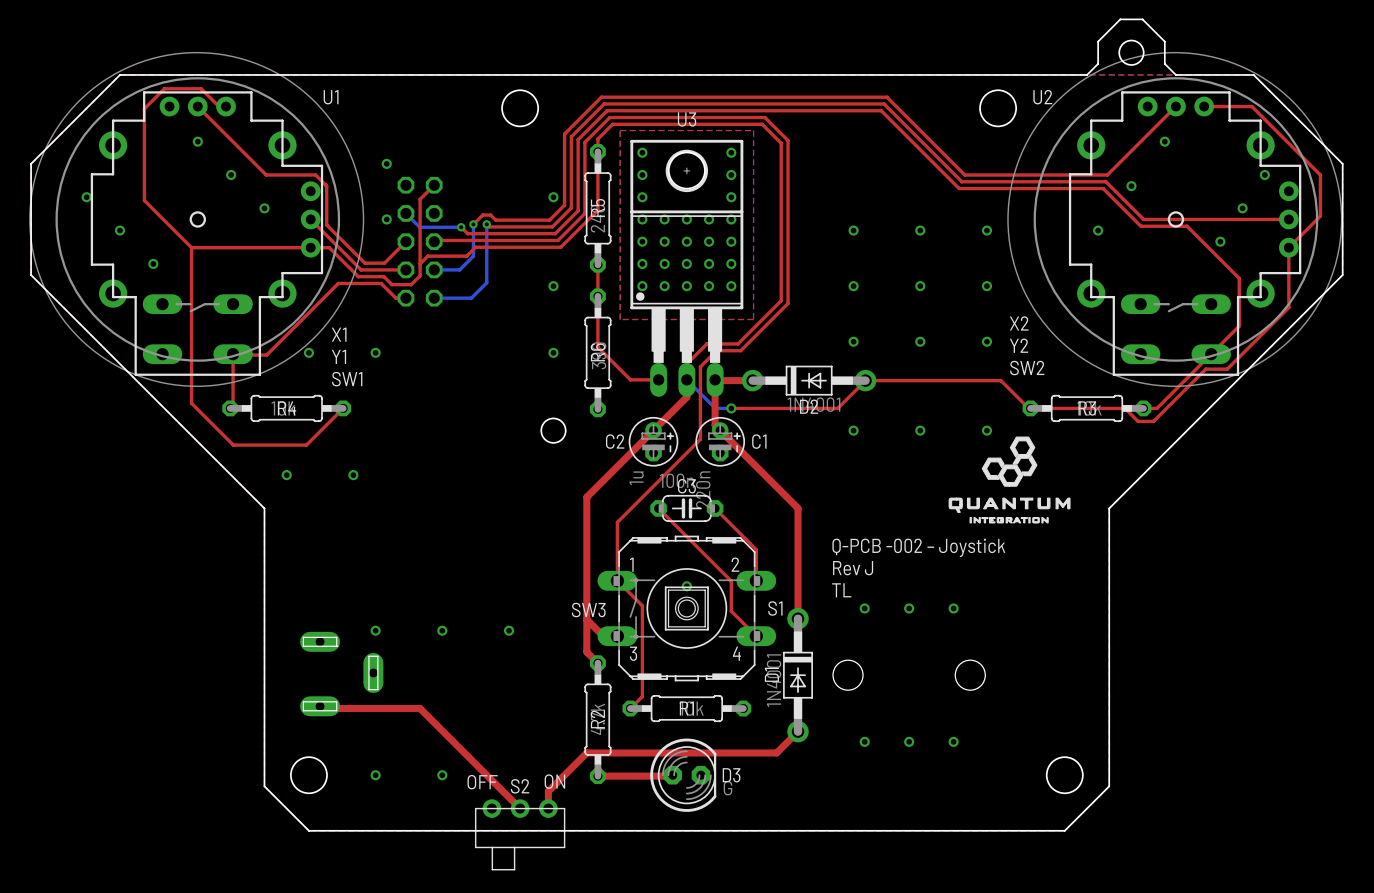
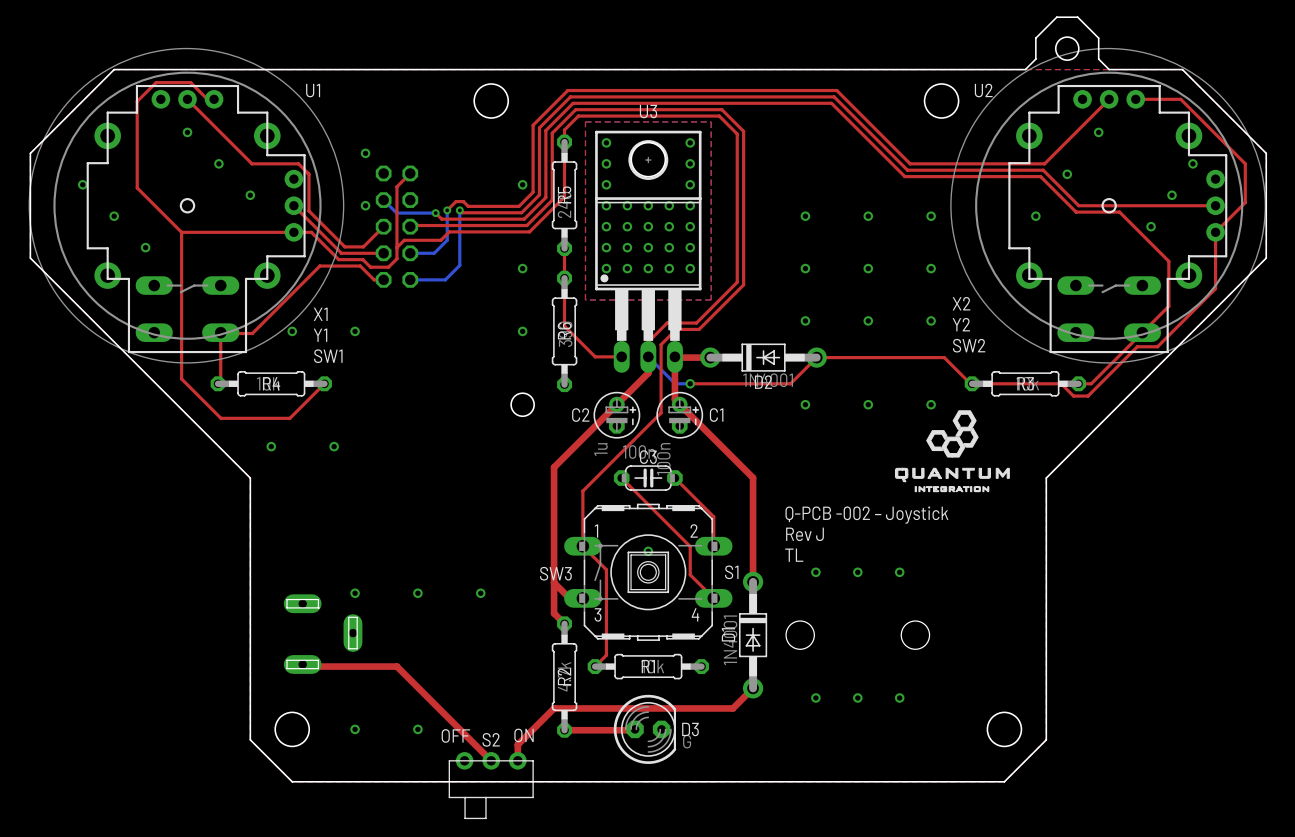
C1 value: 220n (703, 489) -> 100n (663, 459)

